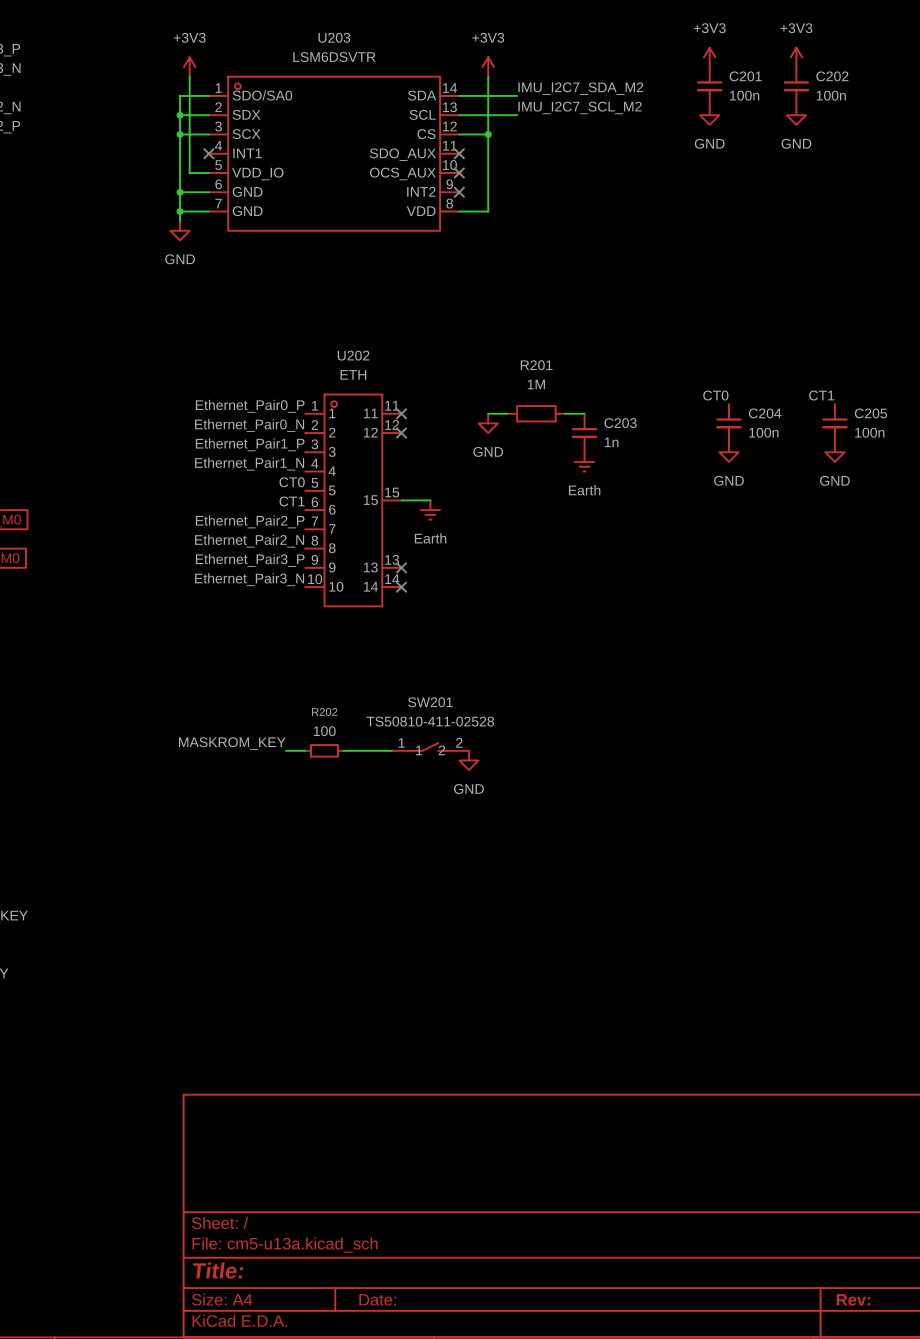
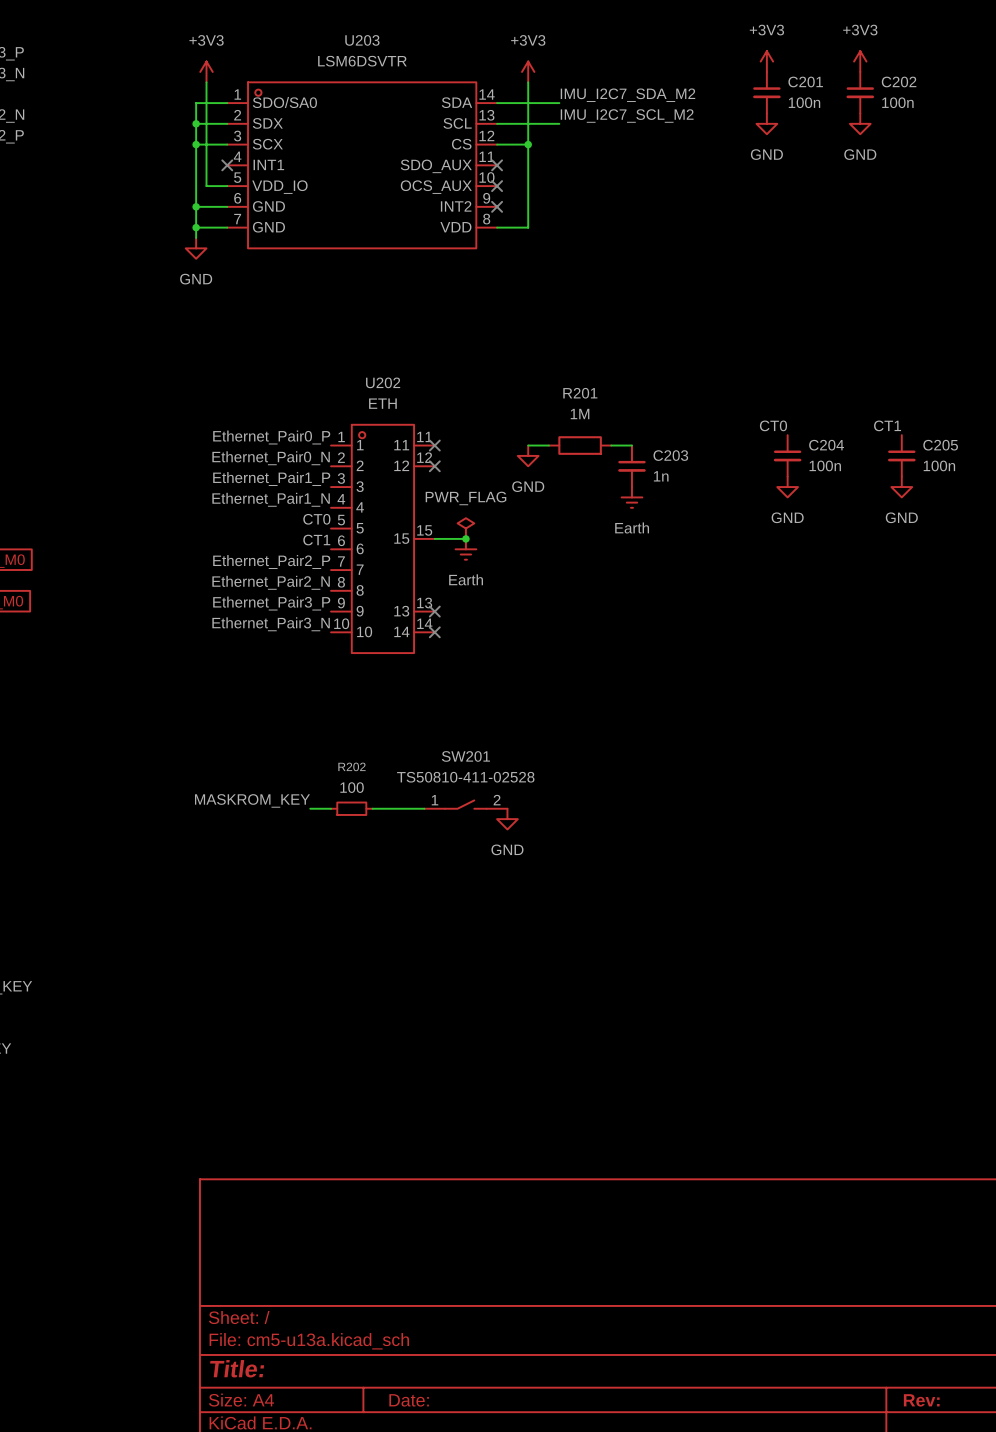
power symbol: none -> PWR_FLAG (465, 528)
junction: none -> (465, 538)
SW201 pin name: 1 (419, 750) -> none
SW201 pin name: 2 (441, 750) -> none

